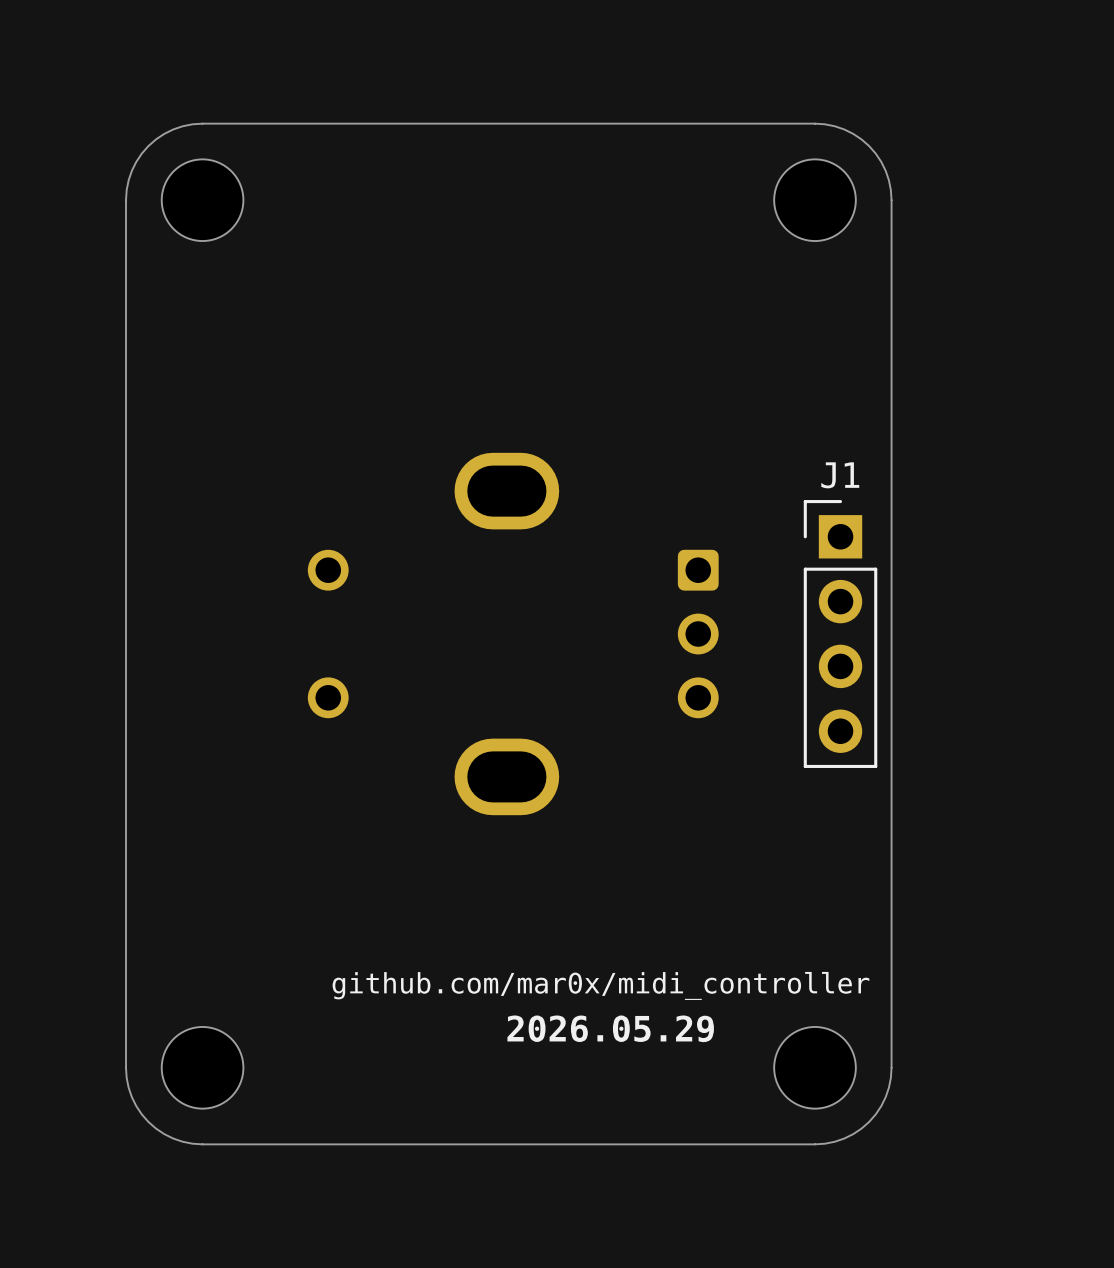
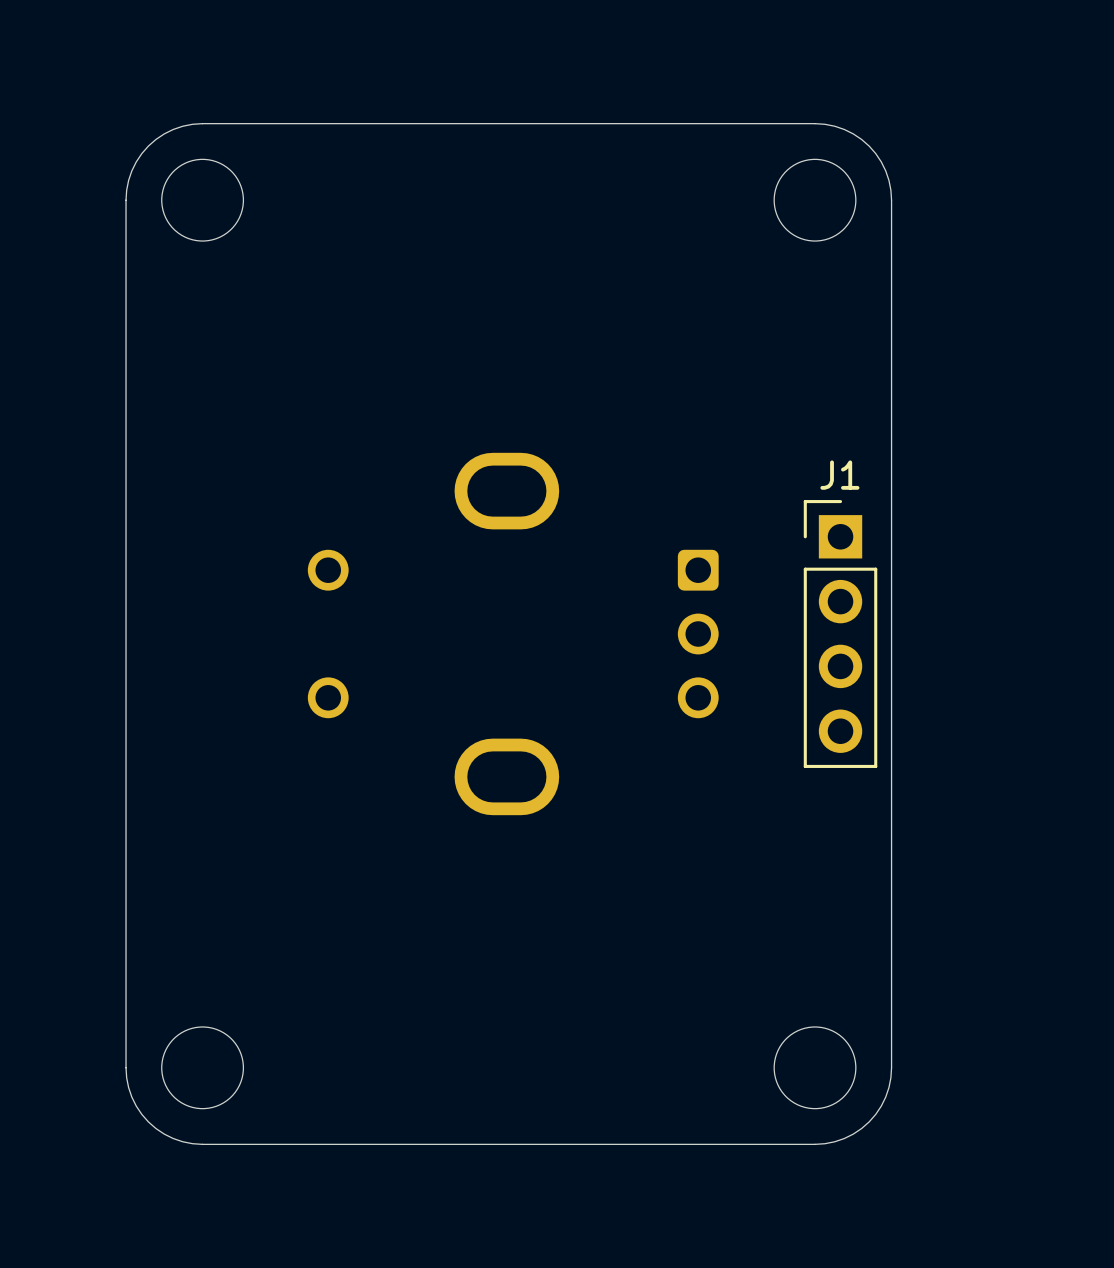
text: github.com/mar0x/midi_controller (600, 985) -> none
text: 2026.05.29 (610, 1028) -> none

